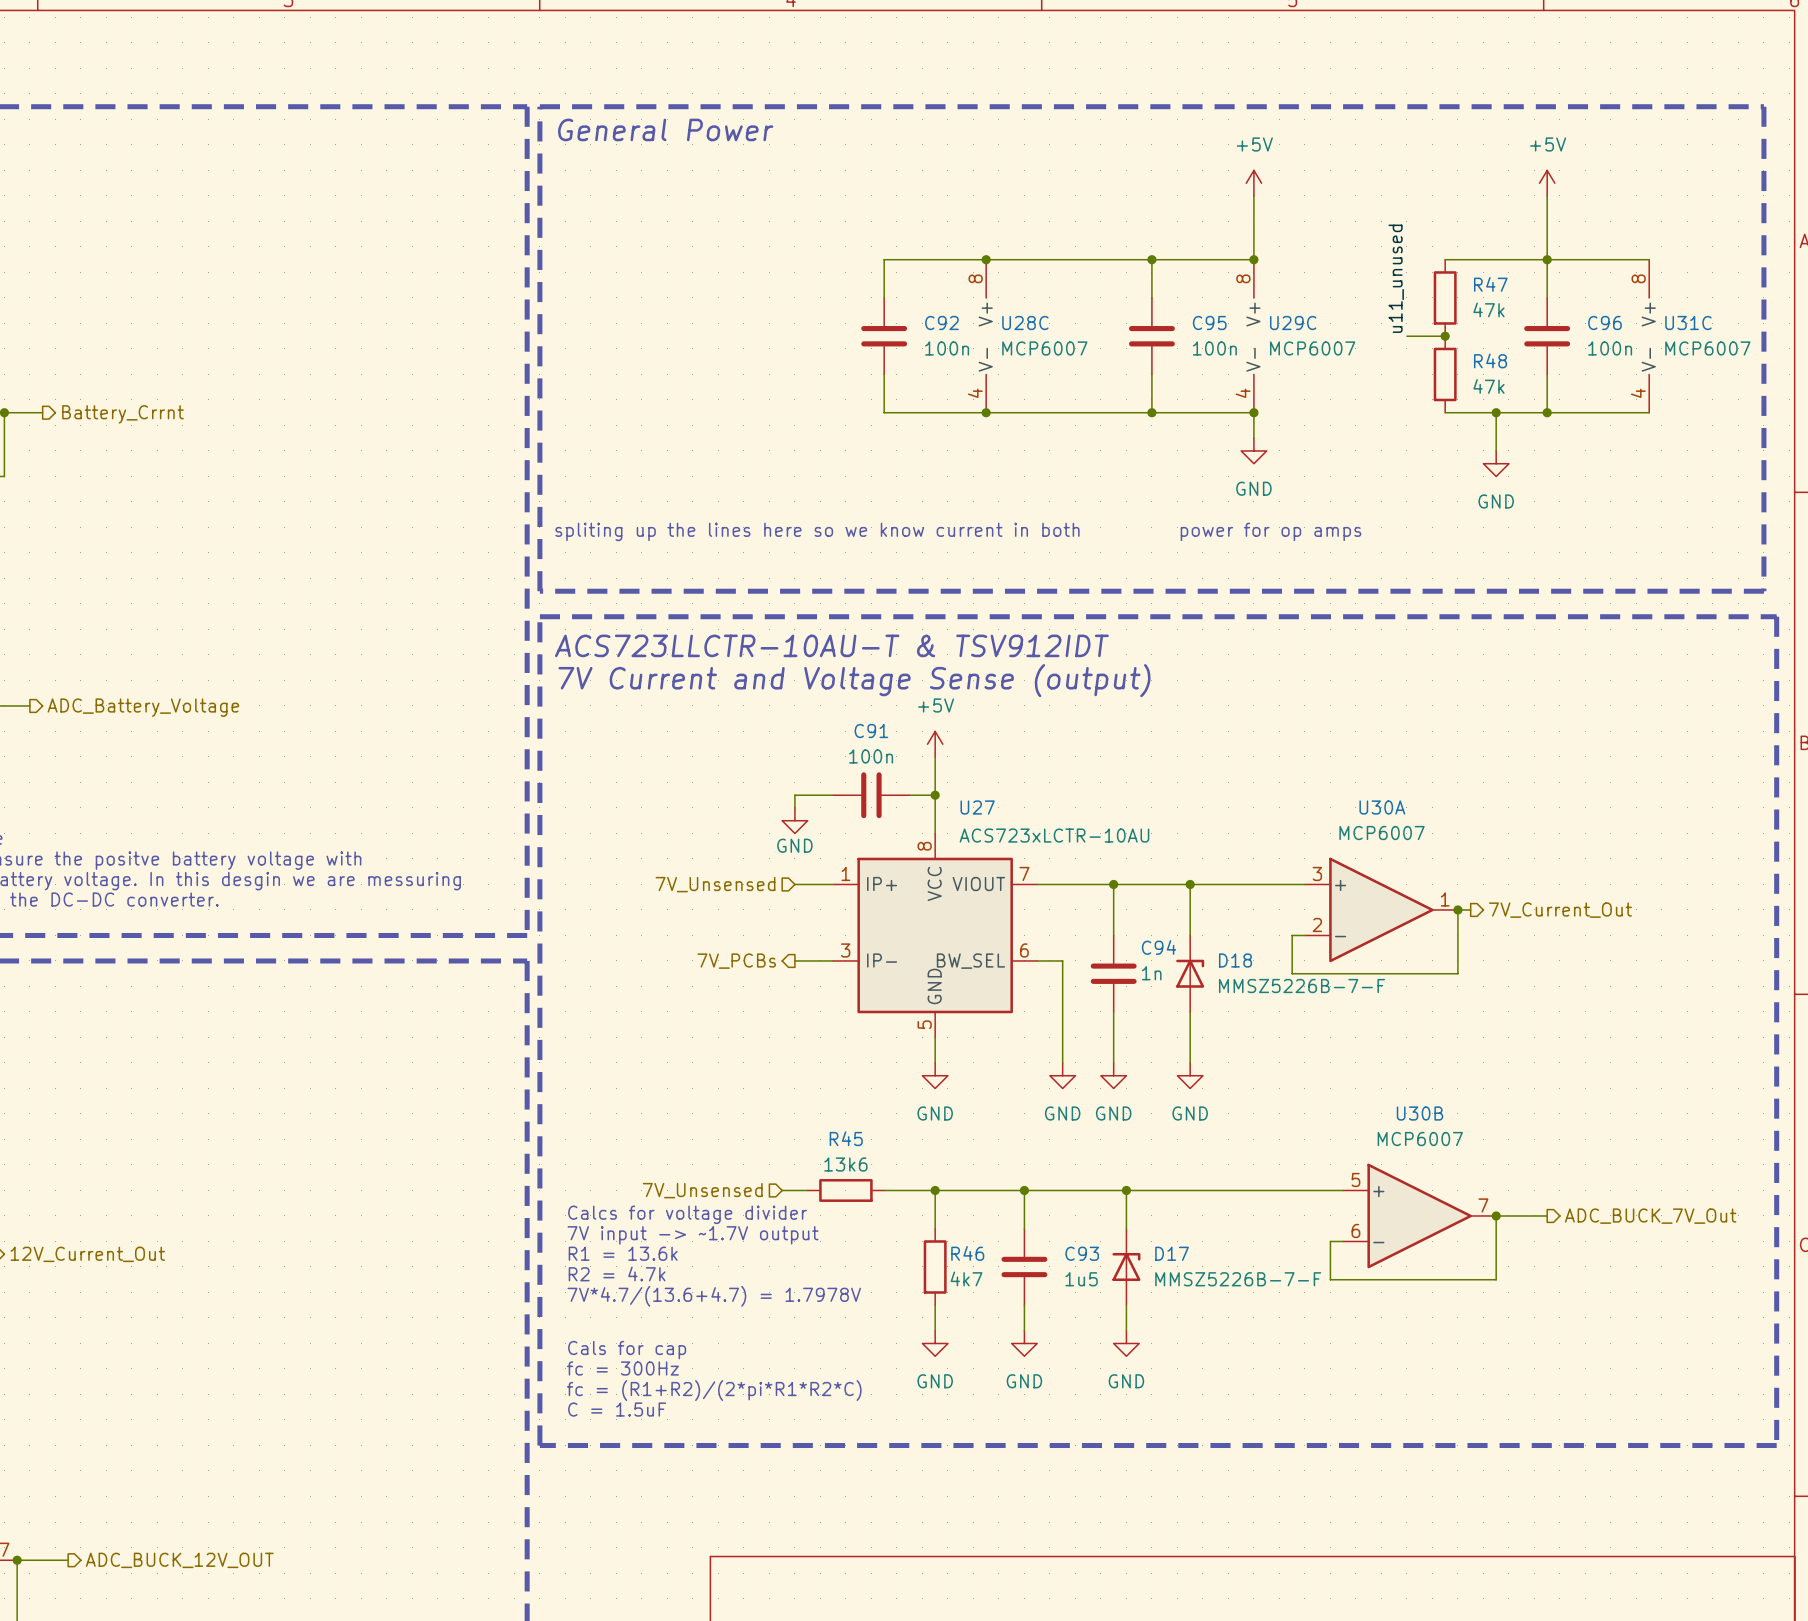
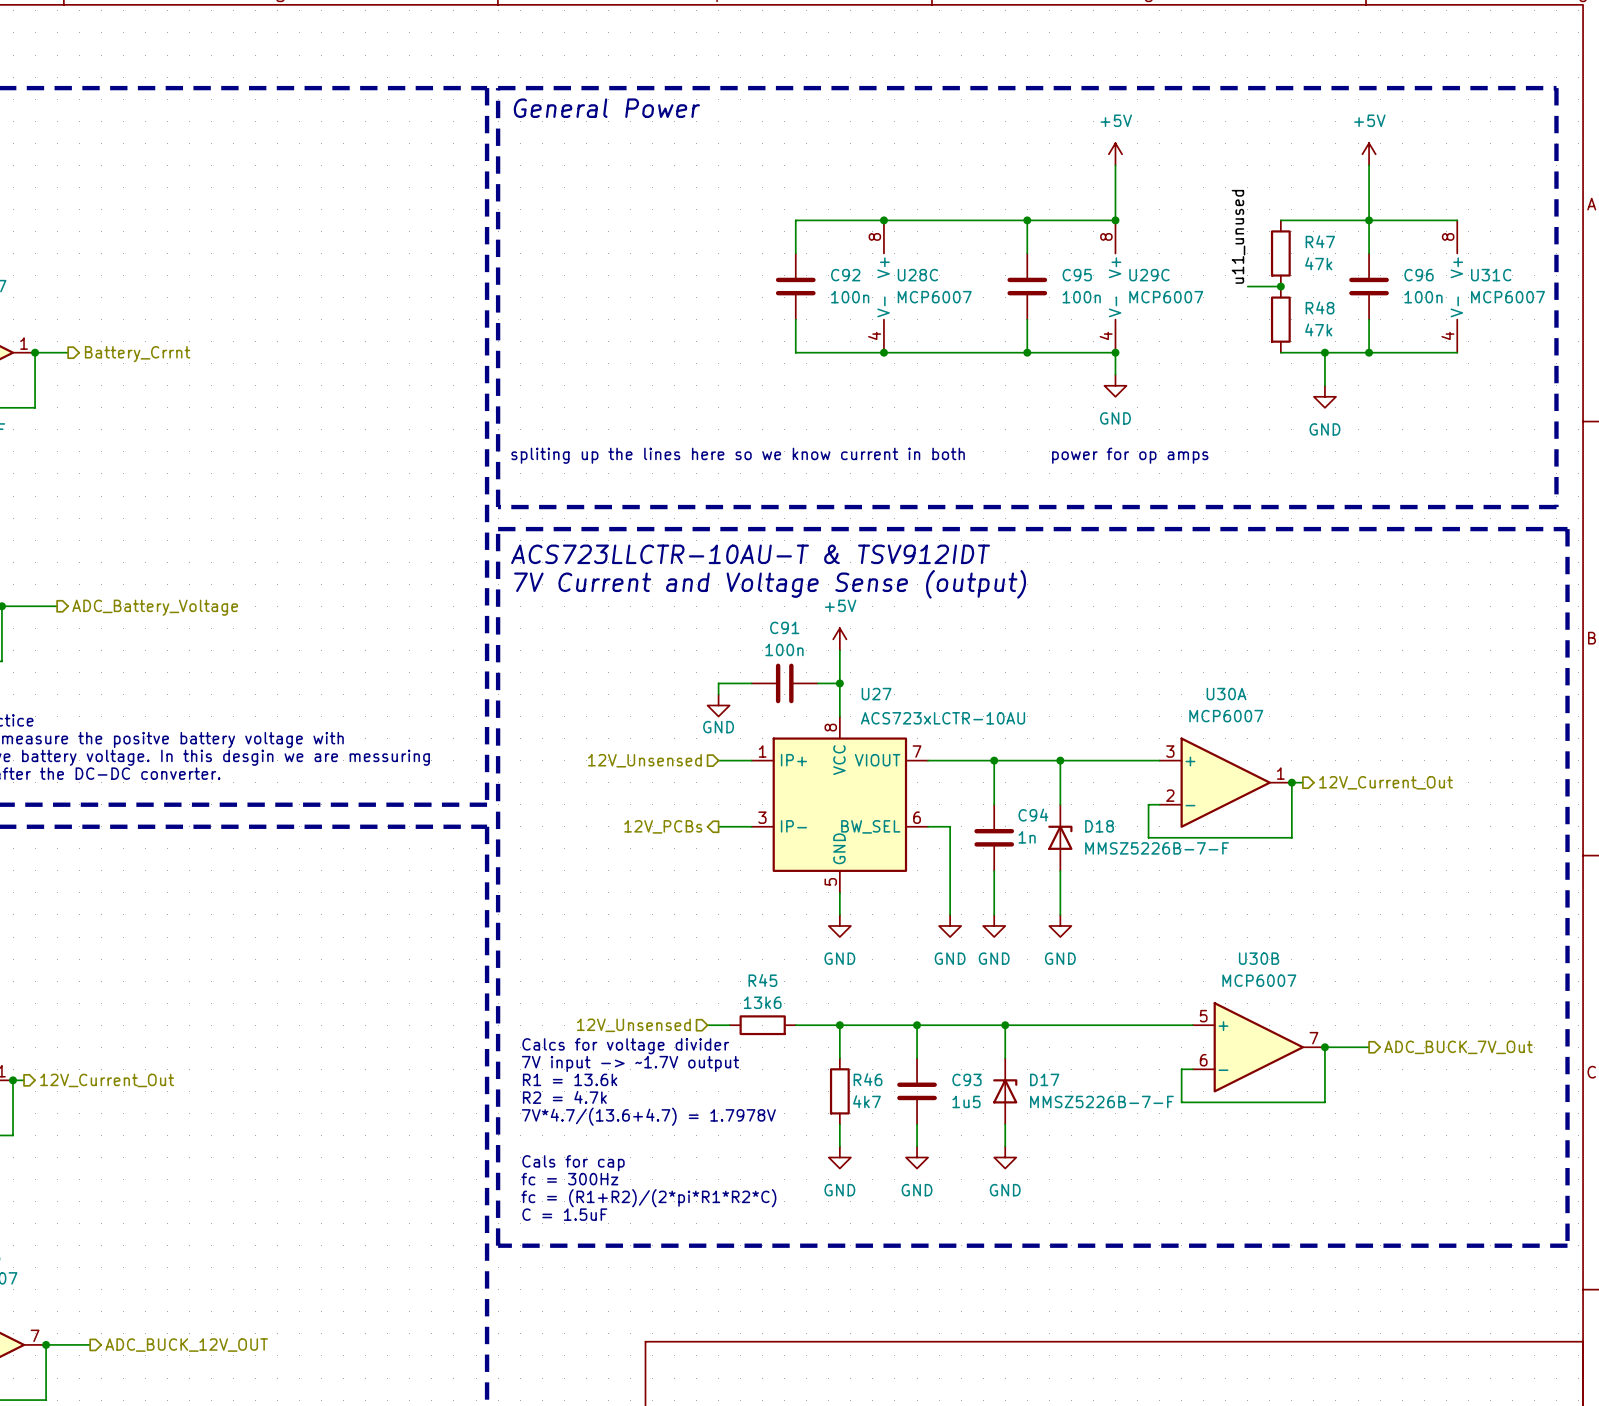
hierarchical label: 7V_Unsensed (715, 884) -> 12V_Unsensed (644, 760)
hierarchical label: 7V_Current_Out (1560, 910) -> 12V_Current_Out (1386, 782)
hierarchical label: 7V_PCBs (736, 961) -> 12V_PCBs (663, 826)
hierarchical label: 7V_Unsensed (702, 1190) -> 12V_Unsensed (633, 1025)

